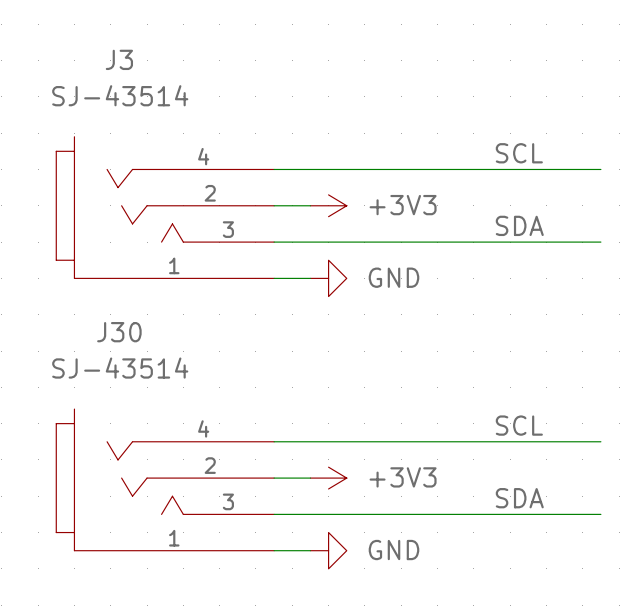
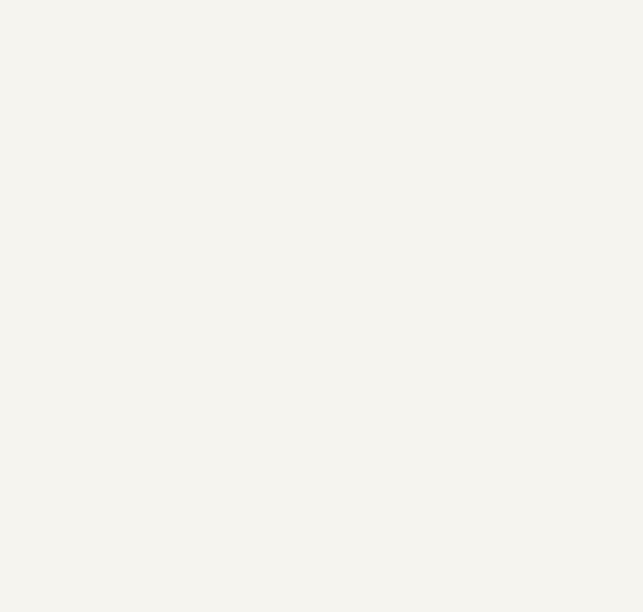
label: SCL (519, 153) -> none
wire: (274, 169) (600, 169) -> none
wire: (274, 205) (310, 205) -> none
power symbol: +3V3 (328, 205) -> none
J3: SJ-43514 (165, 207) -> none
label: SDA (519, 225) -> none
wire: (274, 242) (600, 242) -> none
wire: (274, 278) (310, 278) -> none
power symbol: GND (328, 278) -> none
label: SCL (519, 425) -> none
wire: (274, 441) (600, 441) -> none
wire: (274, 478) (310, 478) -> none
power symbol: +3V3 (328, 478) -> none
J30: SJ-43514 (165, 479) -> none
label: SDA (519, 498) -> none
wire: (274, 514) (600, 514) -> none
wire: (274, 550) (310, 550) -> none
power symbol: GND (328, 550) -> none

